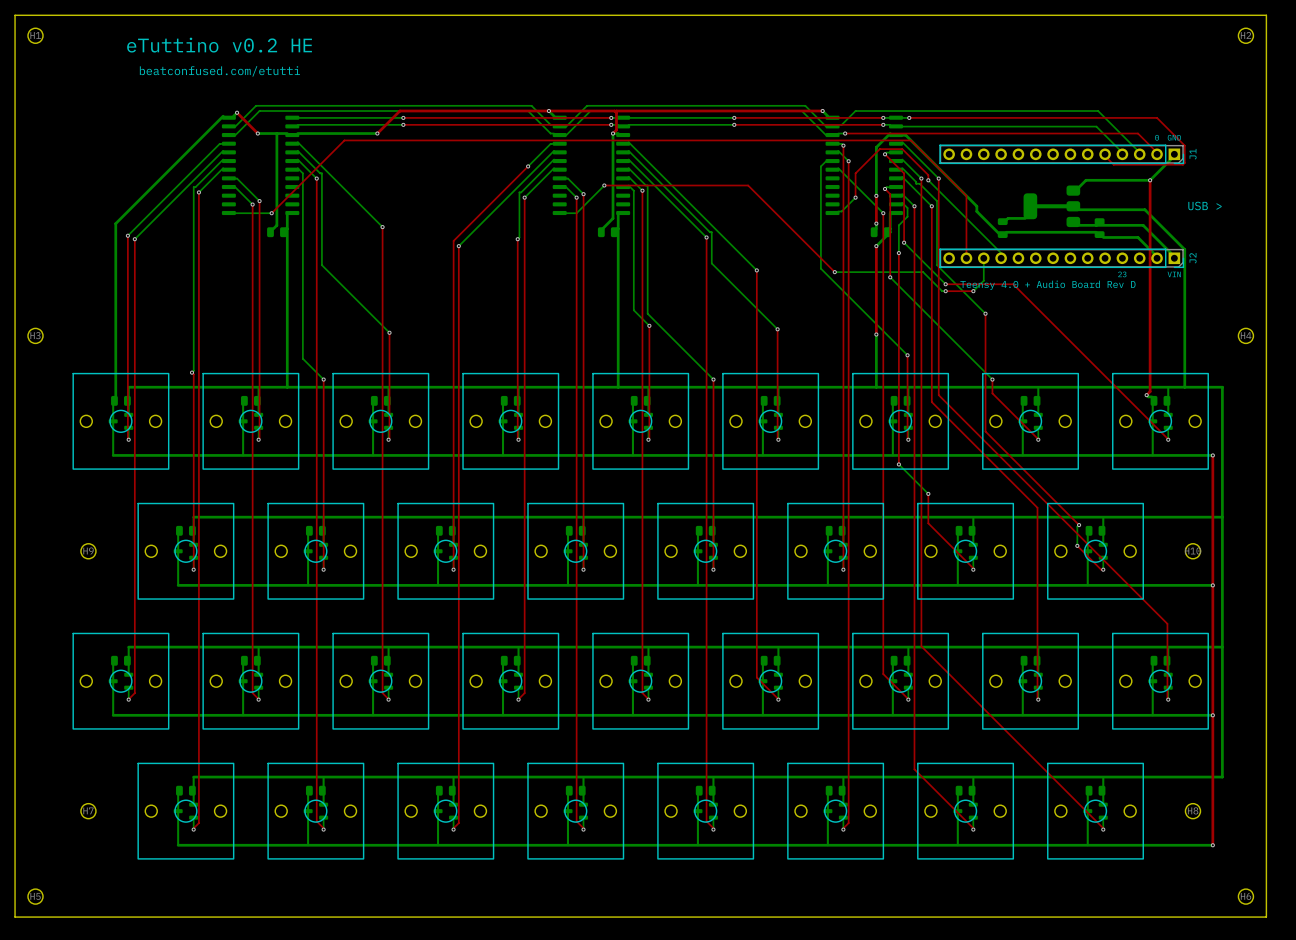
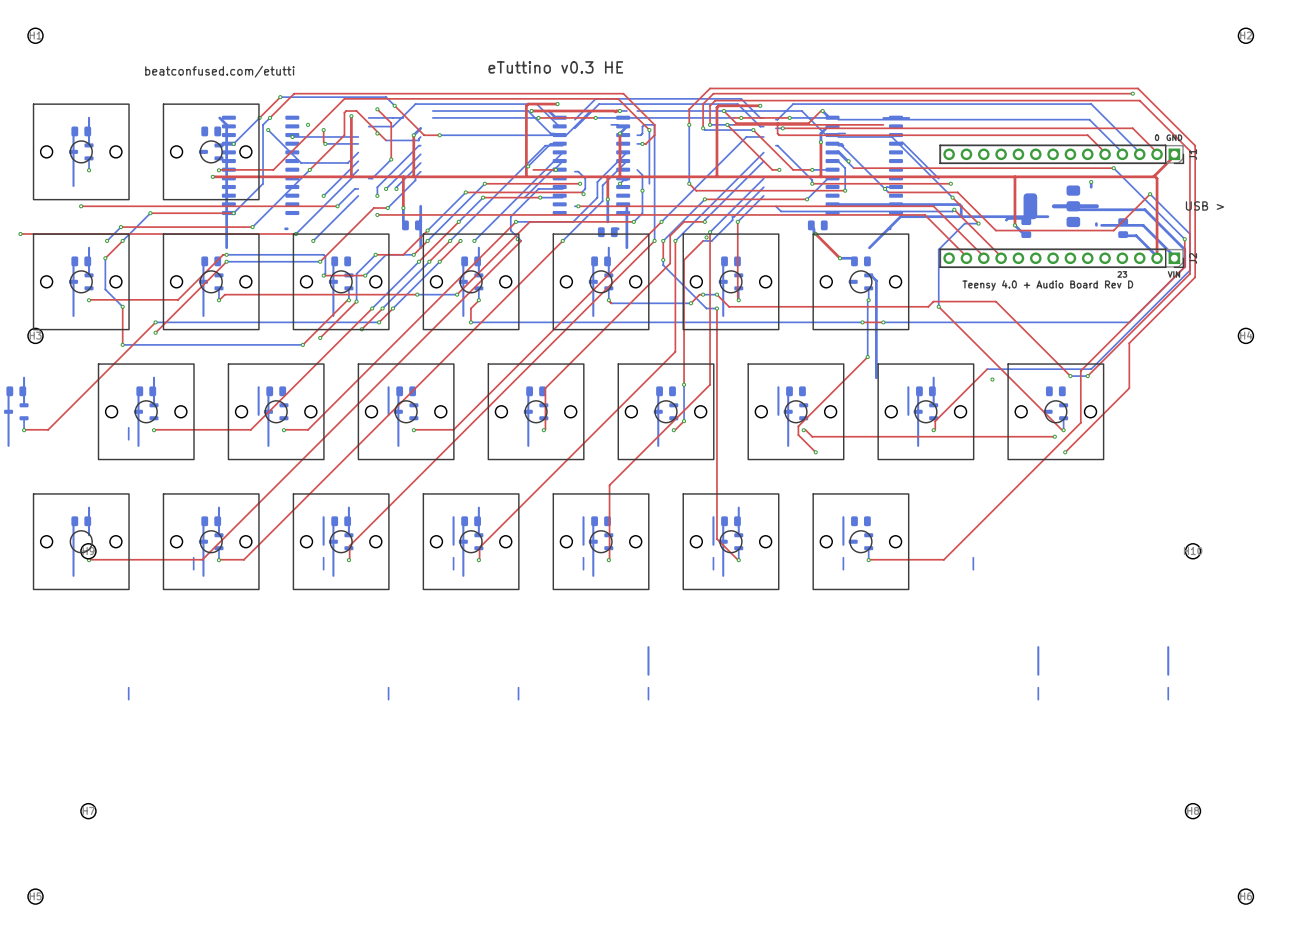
board edge: (15, 15) (1266, 15) (1266, 917) (15, 917) (15, 15) -> none
text: eTuttino v0.2 HE (219, 45) -> none
text: none -> eTuttino v0.3 HE (555, 67)
top track: none -> (1132, 93) (713, 93) (703, 104) (703, 128)
via: none -> (1132, 93)
top track: none -> (280, 97) (259, 117)
bottom track: none -> (280, 97) (386, 97) (394, 105)
via: none -> (280, 97)
top track: none -> (557, 104) (528, 104) (526, 105) (526, 176)
via: none -> (557, 104)
top track: none -> (394, 105) (424, 135) (439, 135)
via: none -> (394, 105)
top track: none -> (760, 105) (718, 105) (716, 107) (716, 176)
via: none -> (760, 105)
top track: none -> (377, 109) (391, 123) (391, 159)
via: none -> (377, 109)
bottom track: (432, 111) (259, 111) (235, 135) -> none
top track: (531, 111) (399, 111) (377, 133) -> none
via: none -> (531, 111)
via: (548, 111) -> none
top track: (614, 111) (616, 112) (616, 130) (613, 133) -> none
top track: (619, 111) (822, 111) -> none
via: none -> (619, 111)
top track: none -> (723, 111) (736, 123) (808, 123) (820, 111)
via: none -> (723, 111)
bottom track: (1098, 111) (855, 111) (841, 124) (838, 124) -> (1098, 111) (1091, 104) (793, 104) (775, 119)
top track: (237, 112) (257, 133) -> none
bottom track: (237, 112) (233, 116) -> none
via: (237, 112) -> none
bottom track: (223, 116) (115, 223) (115, 396) -> none
top track: none -> (351, 116) (351, 176)
via: none -> (351, 116)
bottom track: none -> (89, 117) (89, 145)
bottom track: none -> (219, 117) (226, 124) (226, 247)
bottom track: none -> (259, 117) (233, 143)
via: none -> (259, 117)
top track: none -> (269, 117) (294, 93) (623, 93) (654, 124) (654, 135) (645, 143) (642, 143)
bottom track: none -> (269, 117) (263, 124) (263, 183) (233, 213)
via: none -> (269, 117)
bottom track: (297, 117) (368, 117) -> none
top track: (403, 117) (538, 117) -> none
via: (403, 117) -> none
via: none -> (538, 117)
top track: (595, 117) (611, 117) -> none
bottom track: none -> (595, 117) (611, 117)
via: none -> (595, 117)
via: (611, 117) -> none
via: (734, 117) -> none
via: none -> (741, 117)
bottom track: none -> (763, 117) (760, 117) (741, 98) (595, 98) (574, 119)
top track: (789, 117) (883, 117) -> none
bottom track: none -> (789, 117) (827, 117)
via: none -> (789, 117)
via: (883, 117) -> none
top track: (909, 117) (1157, 117) -> (710, 124) (710, 105) (715, 100) (1139, 100) (1157, 117)
via: (909, 117) -> none
top track: none -> (777, 123) (779, 135) (1087, 135) (1103, 150)
bottom track: (297, 124) (403, 124) -> (432, 117) (538, 117)
via: none -> (308, 124)
top track: (403, 124) (611, 124) -> none
via: (403, 124) -> none
bottom track: (554, 124) (550, 124) (531, 105) (256, 105) (235, 126) -> none
via: (611, 124) -> none
bottom track: (628, 124) (644, 124) -> (637, 135) (642, 133) (644, 124)
bottom track: (654, 124) (710, 124) -> (654, 124) (654, 240)
top track: none -> (689, 124) (689, 109) (710, 88) (1137, 88) (1195, 145) (1195, 277) (1129, 343) (1129, 388) (1065, 452)
bottom track: none -> (689, 124) (689, 183)
via: none -> (689, 124)
via: none -> (710, 124)
top track: none -> (727, 124) (772, 169) (779, 169)
via: none -> (727, 124)
via: (734, 124) -> none
bottom track: (883, 124) (890, 124) -> (775, 128) (782, 128)
via: (883, 124) -> none
bottom track: none -> (368, 126) (392, 126) (415, 104) (536, 104) (559, 126) (562, 126)
bottom track: (566, 126) (587, 105) (805, 105) (826, 126) -> none
bottom track: none -> (626, 126) (619, 133)
bottom track: none -> (763, 126) (760, 126) (737, 104) (599, 104) (574, 128)
bottom track: none -> (827, 126) (820, 133) (820, 142)
bottom track: (902, 126) (1096, 126) -> (838, 119) (1089, 119) (1096, 126)
bottom track: none -> (420, 128) (413, 135)
bottom track: none -> (703, 128) (704, 130) (753, 130)
via: none -> (703, 128)
via: none -> (782, 128)
bottom track: none -> (268, 130) (297, 159)
via: none -> (268, 130)
top track: none -> (323, 130) (323, 142) (325, 143)
via: none -> (323, 130)
top track: none -> (649, 130) (618, 98) (344, 98) (273, 169) (219, 169)
bottom track: none -> (649, 130) (649, 183)
via: none -> (649, 130)
top track: none -> (753, 130) (793, 169) (812, 169)
via: none -> (753, 130)
bottom track: none -> (73, 131) (73, 186)
part: none -> (81, 131)
part: none -> (211, 131)
bottom track: (257, 133) (287, 133) -> none
via: (257, 133) -> none
bottom track: (276, 133) (276, 225) (273, 228) -> none
bottom track: (297, 133) (377, 133) -> none
via: (613, 133) -> none
bottom track: (618, 133) (613, 133) (613, 218) (602, 228) -> none
top track: none -> (619, 133) (619, 176)
via: none -> (619, 133)
top track: (845, 133) (1137, 133) -> (782, 128) (1132, 128) (1137, 133)
via: (845, 133) -> none
bottom track: (890, 133) (876, 147) (876, 195) -> none
top track: none -> (413, 135) (413, 176)
via: none -> (413, 135)
bottom track: none -> (439, 135) (562, 135)
via: none -> (439, 135)
bottom track: (902, 135) (905, 135) (976, 206) (976, 211) (999, 234) -> none
bottom track: none -> (292, 136) (358, 136)
via: none -> (292, 136)
bottom track: none -> (420, 136) (418, 140) (386, 140)
bottom track: none -> (763, 136) (746, 136) (661, 221)
bottom track: none -> (838, 136) (891, 136) (952, 197)
top track: none -> (386, 140) (356, 111) (346, 111) (344, 112) (344, 135) (309, 169)
bottom track: (297, 142) (382, 227) -> none
bottom track: (628, 142) (756, 270) -> none
top track: none -> (820, 142) (820, 176)
via: none -> (820, 142)
bottom track: (223, 143) (219, 143) (150, 213) -> none
via: none -> (233, 143)
bottom track: none -> (325, 143) (358, 143)
via: none -> (325, 143)
bottom track: none -> (637, 143) (642, 143)
via: none -> (642, 143)
bottom track: none -> (420, 145) (377, 187) (377, 195)
bottom track: none -> (562, 145) (545, 145) (450, 240)
bottom track: none -> (775, 145) (812, 180) (812, 183)
bottom track: none -> (838, 145) (841, 145) (888, 192)
top track: (843, 145) (843, 568) -> none
via: (843, 145) -> none
top track: (1184, 145) (1184, 162) (1183, 164) (1113, 164) (1106, 157) -> (1184, 145) (1189, 150) (1189, 273) (1087, 376)
bottom track: (223, 150) (134, 239) -> none
bottom track: (297, 150) (321, 173) (321, 265) (389, 332) -> none
bottom track: (554, 150) (458, 246) -> none
bottom track: (628, 150) (711, 232) (711, 263) (777, 329) -> none
part: none -> (81, 151)
part: none -> (81, 151)
part: none -> (211, 151)
part: none -> (211, 151)
bottom track: none -> (562, 152) (474, 240)
bottom track: none -> (626, 152) (597, 182) (597, 197) (573, 221) (515, 221)
bottom track: none -> (763, 152) (675, 240)
bottom track: none -> (838, 152) (853, 168)
bottom track: (890, 152) (885, 154) -> none
bottom track: none -> (420, 154) (386, 188)
top track: (885, 154) (904, 173) (904, 242) -> none
via: (885, 154) -> none
bottom track: none -> (89, 158) (89, 170)
bottom track: (223, 159) (193, 187) (193, 370) (191, 372) -> none
bottom track: none -> (391, 159) (372, 178) (368, 178)
via: none -> (391, 159)
bottom track: (554, 159) (519, 192) (519, 237) (517, 239) -> none
bottom track: (628, 159) (706, 237) -> none
bottom track: (902, 159) (921, 178) -> none
top track: none -> (1170, 159) (1153, 176) (212, 176)
bottom track: (1170, 159) (1150, 180) (1086, 180) (1079, 187) -> none
bottom track: none -> (358, 161) (323, 195)
bottom track: none -> (562, 161) (555, 169)
bottom track: none -> (626, 161) (602, 185) (602, 201) (562, 240)
bottom track: none -> (763, 161) (704, 221)
bottom track: (826, 161) (820, 166) (820, 268) (907, 355) -> none
bottom track: none -> (838, 161) (845, 168) (845, 190)
top track: (848, 161) (848, 823) (843, 828) -> none
bottom track: (301, 162) (316, 178) -> (301, 162) (347, 162) (358, 152)
bottom track: none -> (420, 162) (396, 188)
top track: (528, 166) (453, 240) (453, 568) -> none
bottom track: (223, 168) (198, 192) -> none
bottom track: (297, 168) (302, 173) (302, 358) (323, 379) -> none
bottom track: (628, 168) (647, 185) (647, 313) (713, 379) -> none
bottom track: (838, 168) (883, 213) -> none
top track: none -> (853, 168) (1113, 168)
bottom track: (902, 168) (916, 183) (919, 183) (937, 201) (937, 265) (985, 313) -> none
bottom track: none -> (1113, 168) (1184, 239)
via: none -> (1113, 168)
bottom track: none -> (309, 169) (252, 227)
via: none -> (309, 169)
bottom track: none -> (358, 169) (295, 234)
top track: none -> (533, 169) (555, 169)
via: none -> (555, 169)
bottom track: none -> (637, 169) (642, 175) (642, 213) (633, 221)
via: none -> (779, 169)
bottom track: none -> (812, 169) (827, 169)
via: none -> (812, 169)
via: none -> (89, 170)
via: none -> (218, 170)
bottom track: none -> (420, 171) (415, 176) (415, 180) (387, 208)
bottom track: none -> (574, 171) (578, 171) (585, 178) (585, 188) (581, 192)
top track: none -> (1154, 175) (1157, 178) (1157, 253)
via: none -> (212, 176)
top track: none -> (403, 176) (403, 208)
top track: none -> (607, 176) (607, 199)
bottom track: (628, 176) (642, 190) -> none
bottom track: (902, 176) (931, 206) -> none
top track: none -> (1014, 176) (1014, 225)
bottom track: (235, 178) (259, 201) -> none
top track: (316, 178) (316, 821) (323, 828) -> none
via: (316, 178) -> none
bottom track: (566, 178) (583, 194) -> none
bottom track: none -> (763, 178) (710, 232)
bottom track: none -> (827, 178) (807, 199)
top track: (921, 178) (921, 646) (1103, 828) -> none
via: (921, 178) -> none
top track: (938, 178) (938, 395) (1167, 623) (1167, 698) -> none
via: (938, 178) -> none
bottom track: none -> (626, 180) (623, 180) (619, 183)
top track: (928, 180) (928, 175) (902, 149) (879, 149) (855, 173) (855, 197) -> none
bottom track: (928, 180) (1001, 253) -> none
via: (928, 180) -> none
top track: (1150, 180) (1150, 391) (1146, 395) -> none
via position: (1150, 180) -> (1150, 194)
bottom track: none -> (1091, 182) (1091, 187)
via: none -> (1091, 182)
top track: none -> (484, 183) (580, 183)
bottom track: none -> (484, 183) (427, 240)
via: none -> (484, 183)
via: none -> (580, 183)
via: none -> (619, 183)
top track: none -> (689, 183) (696, 190) (845, 190)
via: none -> (689, 183)
top track: none -> (812, 183) (950, 183)
via: none -> (812, 183)
via: none -> (950, 183)
top track: (604, 185) (748, 185) (834, 272) -> none
bottom track: (604, 185) (576, 213) (566, 213) -> none
via: (604, 185) -> none
bottom track: (628, 185) (633, 190) (633, 310) (649, 325) -> none
bottom track: (235, 187) (252, 204) -> none
bottom track: (566, 187) (576, 197) -> none
bottom track: none -> (763, 187) (732, 216) (732, 220) (711, 240) (703, 240)
bottom track: none -> (358, 188) (354, 188) (337, 206)
via: none -> (386, 188)
via: none -> (396, 188)
bottom track: none -> (562, 188) (538, 188) (510, 216) (510, 230) (521, 240)
top track: (885, 188) (890, 194) (890, 277) -> none
top track: (642, 190) (642, 693) (647, 698) -> none
top track: (198, 192) (198, 823) (193, 828) -> none
via: (198, 192) -> none
top track: none -> (465, 192) (581, 192)
bottom track: none -> (465, 192) (427, 230)
via: none -> (465, 192)
top track: none -> (888, 192) (957, 192) (995, 230) (1113, 230) (1150, 194)
top track: (583, 194) (583, 568) -> none
bottom track: (902, 194) (914, 206) -> none
bottom track: none -> (1150, 194) (1189, 234) (1189, 270) (1091, 369) (987, 369)
via: none -> (323, 195)
bottom track: none -> (358, 195) (313, 240)
via: none -> (377, 195)
bottom track: none -> (763, 195) (737, 221)
top track: (876, 195) (876, 223) -> none
via: (876, 195) -> none
top track: none -> (483, 197) (540, 197)
bottom track: none -> (483, 197) (458, 221)
via: none -> (483, 197)
top track: (524, 197) (524, 693) (519, 698) -> none
via: (524, 197) -> none
bottom track: none -> (540, 197) (562, 197)
via: none -> (540, 197)
top track: (576, 197) (576, 821) (583, 828) -> none
via: (576, 197) -> none
bottom track: (855, 197) (841, 211) -> (954, 209) (952, 211) (841, 211)
via position: (855, 197) -> (845, 190)
top track: none -> (952, 197) (978, 223)
via: none -> (952, 197)
bottom track: none -> (607, 199) (607, 221)
via: none -> (607, 199)
top track: none -> (704, 199) (807, 199)
bottom track: none -> (704, 199) (663, 240)
via: none -> (704, 199)
via: none -> (807, 199)
top track: (259, 201) (259, 438) -> none
via: (259, 201) -> none
bottom track: (902, 202) (907, 208) (907, 216) (898, 225) (898, 253) -> none
top track: (252, 204) (252, 693) (257, 698) -> none
via: (252, 204) -> none
bottom track: none -> (838, 204) (959, 204) (961, 216)
top track: none -> (81, 206) (337, 206)
via: none -> (81, 206)
via: none -> (337, 206)
bottom track: none -> (420, 206) (420, 247)
bottom track: none -> (574, 206) (578, 206)
top track: none -> (578, 206) (933, 206) (982, 254)
via: none -> (578, 206)
bottom track: none -> (626, 206) (626, 247)
bottom track: none -> (775, 206) (781, 211) (838, 211)
top track: (914, 206) (914, 769) (973, 828) -> none
via: (914, 206) -> none
top track: (931, 206) (931, 402) (1037, 507) (1037, 698) -> none
via: (931, 206) -> none
bottom track: (1030, 206) (1053, 206) -> (1073, 206) (1096, 206)
top track: none -> (387, 208) (373, 208) (320, 261)
via: none -> (387, 208)
bottom track: none -> (403, 208) (403, 221)
via: none -> (403, 208)
top track: none -> (954, 209) (999, 254)
via: none -> (954, 209)
top track: none -> (150, 213) (233, 213)
via: none -> (150, 213)
via: none -> (233, 213)
bottom track: (235, 213) (271, 213) -> none
top track: (271, 213) (344, 140) (911, 140) (966, 195) (966, 253) -> none
via: (271, 213) -> none
bottom track: (287, 213) (287, 387) -> none
bottom track: (618, 213) (618, 387) -> none
top track: (883, 213) (883, 674) (907, 698) -> none
via: (883, 213) -> none
bottom track: (890, 213) (890, 232) (876, 246) -> none
top track: none -> (377, 214) (924, 214) (964, 254)
via: none -> (377, 214)
bottom track: none -> (1047, 216) (900, 216) (869, 247)
top track: none -> (458, 221) (418, 261)
via: none -> (458, 221)
top track: none -> (515, 221) (308, 429) (285, 429)
via: none -> (515, 221)
top track: none -> (633, 221) (529, 221) (457, 294)
via: none -> (633, 221)
top track: none -> (661, 221) (453, 429) (415, 429)
via: none -> (661, 221)
top track: none -> (704, 221) (684, 221) (670, 235) (670, 263) (545, 388) (545, 429)
via: none -> (704, 221)
top track: none -> (737, 221) (737, 299)
via: none -> (737, 221)
bottom track: (876, 223) (876, 228) -> none
via: (876, 223) -> none
bottom track: none -> (978, 223) (964, 223) (938, 249) (938, 306)
via: none -> (978, 223)
part: none -> (411, 225)
part: none -> (817, 225)
bottom track: none -> (1014, 225) (1021, 232)
via: none -> (1014, 225)
bottom track: (1079, 225) (1101, 225) -> none
top track: none -> (120, 227) (252, 227)
bottom track: none -> (120, 227) (107, 240)
via: none -> (120, 227)
via: none -> (252, 227)
top track: (382, 227) (382, 693) (387, 698) -> none
via: (382, 227) -> none
bottom track: none -> (813, 228) (815, 234)
part position: (1002, 228) -> (1026, 228)
part position: (1099, 228) -> (1123, 228)
top track: none -> (427, 230) (403, 254) (375, 254)
via: none -> (427, 230)
part: (276, 232) -> none
top track: none -> (710, 232) (710, 384) (609, 485) (609, 559)
via: none -> (710, 232)
part: (880, 232) -> none
bottom track: (1006, 232) (1096, 232) -> none
top track: none -> (20, 234) (295, 234)
via: none -> (20, 234)
via: none -> (295, 234)
top track: none -> (815, 234) (839, 258)
via: none -> (815, 234)
top track: (127, 235) (127, 438) -> none
bottom track: none -> (127, 235) (122, 240)
via: (127, 235) -> none
top track: (706, 237) (706, 821) (713, 828) -> none
bottom track: (1103, 237) (1137, 237) -> (1127, 235) (1137, 237)
top track: (134, 239) (134, 693) (129, 698) -> none
via: (134, 239) -> none
top track: (517, 239) (517, 438) -> none
top track: none -> (1184, 239) (1184, 266) (1080, 370) (1080, 422) (943, 559) (869, 559)
via: none -> (1184, 239)
via: none -> (107, 240)
top track: none -> (122, 240) (105, 258)
via: none -> (122, 240)
via: none -> (313, 240)
top track: none -> (427, 240) (413, 254)
via: none -> (427, 240)
top track: none -> (450, 240) (429, 261)
via: none -> (450, 240)
top track: none -> (460, 240) (439, 261)
via: none -> (460, 240)
via: none -> (474, 240)
top track: none -> (521, 240) (202, 559) (89, 559)
top track: none -> (562, 240) (243, 559) (219, 559)
via: none -> (562, 240)
top track: none -> (654, 240) (349, 545) (349, 559)
via: none -> (654, 240)
top track: none -> (663, 240) (663, 260)
via: none -> (663, 240)
top track: none -> (675, 240) (675, 351) (479, 547) (479, 559)
via: none -> (675, 240)
top track: none -> (703, 240) (684, 260) (684, 384)
bottom track: (904, 242) (945, 284) -> none
via: (904, 242) -> none
top track: (458, 246) (458, 823) (453, 828) -> none
via: (458, 246) -> none
top track: (876, 246) (876, 334) -> none
via: (876, 246) -> none
bottom track: none -> (89, 247) (89, 275)
top track: (898, 253) (898, 464) -> none
via: (898, 253) -> none
top track: none -> (226, 254) (223, 254) (178, 299) (89, 299)
bottom track: none -> (226, 254) (323, 254) (325, 256) (325, 273) (323, 275)
via: none -> (226, 254)
bottom track: none -> (375, 254) (356, 273) (356, 301)
via: none -> (375, 254)
bottom track: none -> (413, 254) (386, 254) (365, 275)
via: none -> (413, 254)
bottom track: none -> (105, 258) (105, 289) (122, 306)
via: none -> (105, 258)
bottom track: none -> (839, 258) (852, 258)
bottom track: none -> (663, 260) (663, 265) (706, 308) (716, 308)
via: none -> (663, 260)
bottom track: none -> (73, 261) (73, 315)
part: none -> (81, 261)
part: none -> (211, 261)
top track: none -> (226, 261) (155, 332)
bottom track: none -> (226, 261) (320, 261)
via: none -> (226, 261)
via: none -> (320, 261)
part: none -> (341, 261)
bottom track: none -> (418, 261) (372, 308)
via: none -> (418, 261)
bottom track: none -> (429, 261) (382, 308)
via: none -> (429, 261)
bottom track: none -> (439, 261) (392, 308)
via: none -> (439, 261)
part: none -> (471, 261)
part: none -> (601, 261)
part: none -> (730, 261)
part: none -> (860, 261)
bottom track: (983, 263) (983, 280) (973, 291) -> none
bottom track: (1184, 266) (1184, 387) -> (1184, 266) (1129, 322) (883, 322)
top track: (756, 270) (756, 677) (777, 698) -> none
via: (756, 270) -> none
bottom track: (834, 272) (923, 272) (942, 291) (945, 291) -> none
via position: (834, 272) -> (839, 258)
top track: none -> (323, 275) (365, 275)
via: none -> (323, 275)
via: none -> (365, 275)
bottom track: none -> (871, 275) (876, 280) (876, 334)
bottom track: (890, 277) (992, 379) -> none
via: (890, 277) -> none
part: none -> (81, 281)
part: none -> (81, 281)
part: none -> (211, 281)
part: none -> (211, 281)
part: none -> (341, 281)
part: none -> (341, 281)
part: none -> (471, 281)
part: none -> (471, 281)
part: none -> (601, 281)
part: none -> (601, 281)
part: none -> (730, 281)
part: none -> (730, 281)
part: none -> (860, 281)
part: none -> (860, 281)
top track: (945, 284) (1013, 284) (1167, 438) -> none
via: (945, 284) -> none
bottom track: none -> (608, 288) (608, 300) (611, 303) (690, 303)
bottom track: none -> (868, 288) (867, 357)
top track: (945, 291) (973, 291) -> none
via: (945, 291) -> none
via: (973, 291) -> none
top track: none -> (417, 294) (224, 294) (219, 299)
bottom track: none -> (417, 294) (457, 294)
via: none -> (417, 294)
via: none -> (457, 294)
top track: none -> (703, 294) (699, 294) (690, 303)
bottom track: none -> (703, 294) (716, 294)
via: none -> (703, 294)
top track: none -> (716, 294) (729, 306) (928, 306) (933, 301) (995, 301) (1070, 376)
via: none -> (716, 294)
top track: none -> (347, 299) (302, 344)
via: none -> (89, 300)
via: none -> (218, 300)
via: none -> (348, 300)
via: none -> (478, 300)
top track: none -> (608, 300) (611, 303) (609, 301)
via: none -> (608, 300)
via: none -> (738, 300)
via: none -> (868, 300)
top track: none -> (356, 301) (320, 337)
via: none -> (356, 301)
top track: none -> (477, 301) (470, 308) (470, 322)
via: none -> (690, 303)
top track: none -> (122, 306) (122, 344)
via: none -> (122, 306)
top track: none -> (938, 306) (1061, 429)
via: none -> (938, 306)
top track: none -> (372, 308) (250, 429) (155, 429)
via: none -> (372, 308)
top track: none -> (382, 308) (361, 329)
via: none -> (382, 308)
top track: none -> (392, 308) (379, 322)
via: none -> (392, 308)
top track: none -> (716, 308) (716, 538) (737, 559)
via: none -> (716, 308)
top track: (985, 313) (985, 431) (1079, 525) -> none
via: (985, 313) -> none
top track: none -> (155, 322) (48, 429) (25, 429)
bottom track: none -> (155, 322) (379, 322)
via: none -> (155, 322)
via: none -> (379, 322)
bottom track: none -> (470, 322) (862, 322)
via: none -> (470, 322)
top track: none -> (862, 322) (883, 322)
via: none -> (862, 322)
via: none -> (883, 322)
top track: (649, 325) (649, 438) -> none
via: (649, 325) -> none
via: none -> (361, 329)
top track: (777, 329) (777, 438) -> none
via: (777, 329) -> none
via: none -> (155, 332)
top track: (389, 332) (389, 438) -> none
via: (389, 332) -> none
via: (876, 334) -> none
via: none -> (320, 337)
bottom track: none -> (122, 344) (302, 344)
via: none -> (122, 344)
via: none -> (302, 344)
top track: (907, 355) (907, 438) -> none
via: (907, 355) -> none
top track: none -> (867, 357) (798, 426) (798, 434) (815, 452)
via: none -> (867, 357)
top track: none -> (987, 369) (935, 421) (935, 429)
top track: (191, 372) (193, 374) (193, 568) -> none
via: (191, 372) -> none
bottom track: none -> (1070, 376) (1087, 376)
via: none -> (1070, 376)
via: none -> (1087, 376)
bottom track: none -> (24, 377) (24, 405)
bottom track: none -> (154, 377) (154, 405)
bottom track: (876, 377) (876, 387) -> none
top track: (323, 379) (323, 568) -> none
via: (323, 379) -> none
top track: (713, 379) (713, 568) -> none
via: (713, 379) -> none
top track: (992, 379) (992, 393) (1037, 438) -> none
bottom track: none -> (684, 384) (684, 421)
via: none -> (684, 384)
bottom track: (518, 387) (518, 414) -> (478, 247) (478, 275)
bottom track: (648, 387) (648, 414) -> (608, 247) (608, 275)
bottom track: (1038, 387) (1038, 414) -> none
bottom track: (1168, 387) (1168, 414) -> none
bottom track: none -> (8, 391) (8, 445)
part: none -> (16, 391)
bottom track: none -> (138, 391) (138, 445)
bottom track: (1146, 395) (1151, 396) -> none
via: (1146, 395) -> none
bottom track: (113, 400) (113, 455) (1212, 455) -> none
part position: (120, 400) -> (146, 391)
bottom track: (243, 400) (243, 455) -> (203, 261) (203, 315)
part position: (250, 400) -> (276, 391)
bottom track: (373, 400) (373, 455) -> (333, 261) (333, 315)
part position: (380, 400) -> (406, 391)
bottom track: (503, 400) (503, 455) -> (463, 261) (463, 315)
part position: (510, 400) -> (536, 391)
bottom track: (632, 400) (632, 455) -> (593, 261) (593, 315)
part position: (640, 400) -> (666, 391)
bottom track: (762, 400) (762, 455) -> (723, 261) (723, 315)
part position: (770, 400) -> (795, 391)
bottom track: (892, 400) (892, 455) -> none
part position: (900, 400) -> (925, 391)
bottom track: (1022, 400) (1022, 455) -> none
part position: (1030, 400) -> (1055, 391)
bottom track: (1152, 400) (1152, 455) -> none
part: (1160, 400) -> none
part: none -> (16, 411)
bottom track: (128, 414) (128, 387) (1222, 387) (1222, 777) (193, 777) (193, 804) -> none
bottom track: none -> (24, 418) (24, 430)
part position: (120, 421) -> (146, 411)
part position: (120, 421) -> (146, 411)
part position: (250, 421) -> (276, 411)
part position: (250, 421) -> (276, 411)
part position: (380, 421) -> (406, 411)
part position: (380, 421) -> (406, 411)
part position: (510, 421) -> (536, 411)
part position: (510, 421) -> (536, 411)
part position: (640, 421) -> (666, 411)
part position: (640, 421) -> (666, 411)
top track: none -> (684, 421) (675, 429)
via: none -> (684, 421)
part position: (770, 421) -> (795, 411)
part position: (770, 421) -> (795, 411)
part position: (900, 421) -> (925, 411)
part position: (900, 421) -> (925, 411)
part position: (1030, 421) -> (1055, 411)
part position: (1030, 421) -> (1055, 411)
part: (1160, 421) -> none
part: (1160, 421) -> none
bottom track: (258, 427) (258, 439) -> (218, 288) (218, 300)
bottom track: (388, 427) (388, 439) -> (348, 288) (348, 300)
bottom track: (518, 427) (518, 439) -> (478, 288) (478, 300)
bottom track: (648, 427) (648, 439) -> none
bottom track: (778, 427) (778, 439) -> (738, 288) (738, 300)
bottom track: (908, 427) (908, 439) -> none
bottom track: (1038, 427) (1038, 439) -> none
bottom track: (1168, 427) (1168, 439) -> none
top track: none -> (805, 429) (812, 436) (1054, 436)
via: none -> (24, 430)
via: none -> (673, 430)
via: none -> (803, 430)
via: none -> (933, 430)
via: none -> (1063, 430)
via: none -> (1054, 436)
via position: (128, 439) -> (154, 430)
via position: (258, 439) -> (283, 430)
via position: (388, 439) -> (413, 430)
via position: (518, 439) -> (543, 430)
via: (648, 439) -> none
via: (778, 439) -> none
via: (908, 439) -> none
via: (1038, 439) -> none
via: (1168, 439) -> none
via: none -> (815, 452)
via: none -> (1065, 452)
top track: (1212, 455) (1212, 845) -> none
via: (1212, 455) -> none
bottom track: (898, 464) (928, 493) -> none
via: (898, 464) -> none
top track: (928, 493) (928, 523) (973, 568) -> none
via: (928, 493) -> none
bottom track: none -> (89, 507) (89, 535)
bottom track: (973, 517) (973, 544) -> (933, 377) (933, 405)
bottom track: (1103, 517) (1103, 544) -> none
bottom track: (1222, 517) (193, 517) (193, 544) -> none
bottom track: none -> (73, 521) (73, 575)
part: none -> (81, 521)
bottom track: (1079, 525) (1077, 526) (1077, 545) -> none
via: (1079, 525) -> none
bottom track: (178, 530) (178, 585) (1212, 585) -> none
part position: (185, 530) -> (211, 521)
bottom track: (308, 530) (308, 585) -> (268, 391) (268, 445)
part position: (315, 530) -> (341, 521)
bottom track: (438, 530) (438, 585) -> (398, 391) (398, 445)
part position: (445, 530) -> (471, 521)
bottom track: (567, 530) (567, 585) -> (528, 391) (528, 445)
part position: (575, 530) -> (601, 521)
bottom track: (697, 530) (697, 585) -> (658, 391) (658, 445)
part position: (705, 530) -> (730, 521)
bottom track: (827, 530) (827, 585) -> (788, 391) (788, 445)
part position: (835, 530) -> (860, 521)
bottom track: (957, 530) (957, 585) -> (918, 391) (918, 445)
part: (965, 530) -> none
bottom track: (1087, 530) (1087, 585) -> none
part: (1095, 530) -> none
part: none -> (81, 541)
top track: (1077, 545) (1101, 570) -> none
via: (1077, 545) -> none
part position: (185, 551) -> (211, 541)
part position: (185, 551) -> (211, 541)
part position: (315, 551) -> (341, 541)
part position: (315, 551) -> (341, 541)
part position: (445, 551) -> (471, 541)
part position: (445, 551) -> (471, 541)
part position: (575, 551) -> (601, 541)
part position: (575, 551) -> (601, 541)
part position: (705, 551) -> (730, 541)
part position: (705, 551) -> (730, 541)
part position: (835, 551) -> (860, 541)
part position: (835, 551) -> (860, 541)
part: (965, 551) -> none
part: (965, 551) -> none
part: (1095, 551) -> none
part: (1095, 551) -> none
bottom track: (1103, 557) (1103, 569) -> (1063, 418) (1063, 430)
via: none -> (89, 560)
via position: (193, 569) -> (218, 560)
via position: (323, 569) -> (348, 560)
via position: (453, 569) -> (478, 560)
via position: (583, 569) -> (608, 560)
via position: (713, 569) -> (738, 560)
via position: (843, 569) -> (868, 560)
via: (973, 569) -> none
via: (1103, 569) -> none
via: (1212, 585) -> none
bottom track: (258, 647) (258, 674) -> (218, 507) (218, 535)
bottom track: (388, 647) (388, 674) -> (348, 507) (348, 535)
bottom track: (518, 647) (518, 674) -> (478, 507) (478, 535)
bottom track: (778, 647) (778, 674) -> (738, 507) (738, 535)
bottom track: (908, 647) (908, 674) -> none
bottom track: (1222, 647) (128, 647) (128, 674) -> none
bottom track: (113, 660) (113, 715) (1212, 715) -> none
part: (120, 660) -> none
bottom track: (243, 660) (243, 715) -> (203, 521) (203, 575)
part: (250, 660) -> none
bottom track: (373, 660) (373, 715) -> (333, 521) (333, 575)
part: (380, 660) -> none
bottom track: (503, 660) (503, 715) -> (463, 521) (463, 575)
part: (510, 660) -> none
bottom track: (632, 660) (632, 715) -> (593, 521) (593, 575)
part: (640, 660) -> none
bottom track: (762, 660) (762, 715) -> (723, 521) (723, 575)
part: (770, 660) -> none
bottom track: (892, 660) (892, 715) -> none
part: (900, 660) -> none
bottom track: (1022, 660) (1022, 715) -> none
part: (1030, 660) -> none
bottom track: (1152, 660) (1152, 715) -> none
part: (1160, 660) -> none
part: (120, 681) -> none
part: (120, 681) -> none
part: (250, 681) -> none
part: (250, 681) -> none
part: (380, 681) -> none
part: (380, 681) -> none
part: (510, 681) -> none
part: (510, 681) -> none
part: (640, 681) -> none
part: (640, 681) -> none
part: (770, 681) -> none
part: (770, 681) -> none
part: (900, 681) -> none
part: (900, 681) -> none
part: (1030, 681) -> none
part: (1030, 681) -> none
part: (1160, 681) -> none
part: (1160, 681) -> none
bottom track: (258, 687) (258, 699) -> (218, 548) (218, 560)
bottom track: (778, 687) (778, 699) -> (738, 548) (738, 560)
bottom track: (908, 687) (908, 699) -> (868, 548) (868, 560)
via: (128, 699) -> none
via: (258, 699) -> none
via: (388, 699) -> none
via: (518, 699) -> none
via: (648, 699) -> none
via: (778, 699) -> none
via: (908, 699) -> none
via: (1038, 699) -> none
via: (1168, 699) -> none
via: (1212, 715) -> none
bottom track: (323, 777) (323, 804) -> none
bottom track: (453, 777) (453, 804) -> none
bottom track: (583, 777) (583, 804) -> none
bottom track: (713, 777) (713, 804) -> none
bottom track: (843, 777) (843, 804) -> none
bottom track: (973, 777) (973, 804) -> none
bottom track: (1103, 777) (1103, 804) -> none
bottom track: (178, 790) (178, 845) (1212, 845) -> none
part: (185, 790) -> none
bottom track: (308, 790) (308, 845) -> none
part: (315, 790) -> none
bottom track: (438, 790) (438, 845) -> none
part: (445, 790) -> none
bottom track: (567, 790) (567, 845) -> none
part: (575, 790) -> none
bottom track: (697, 790) (697, 845) -> none
part: (705, 790) -> none
bottom track: (827, 790) (827, 845) -> none
part: (835, 790) -> none
bottom track: (957, 790) (957, 845) -> none
part: (965, 790) -> none
bottom track: (1087, 790) (1087, 845) -> none
part: (1095, 790) -> none
part: (185, 811) -> none
part: (185, 811) -> none
part: (315, 811) -> none
part: (315, 811) -> none
part: (445, 811) -> none
part: (445, 811) -> none
part: (575, 811) -> none
part: (575, 811) -> none
part: (705, 811) -> none
part: (705, 811) -> none
part: (835, 811) -> none
part: (835, 811) -> none
part: (965, 811) -> none
part: (965, 811) -> none
part: (1095, 811) -> none
part: (1095, 811) -> none
bottom track: (193, 817) (193, 829) -> none
bottom track: (323, 817) (323, 829) -> none
bottom track: (453, 817) (453, 829) -> none
bottom track: (583, 817) (583, 829) -> none
bottom track: (713, 817) (713, 829) -> none
bottom track: (843, 817) (843, 829) -> none
bottom track: (973, 817) (973, 829) -> none
bottom track: (1103, 817) (1103, 829) -> none
via: (193, 829) -> none
via: (323, 829) -> none
via: (453, 829) -> none
via: (583, 829) -> none
via: (713, 829) -> none
via: (843, 829) -> none
via: (973, 829) -> none
via: (1103, 829) -> none
via: (1212, 845) -> none

